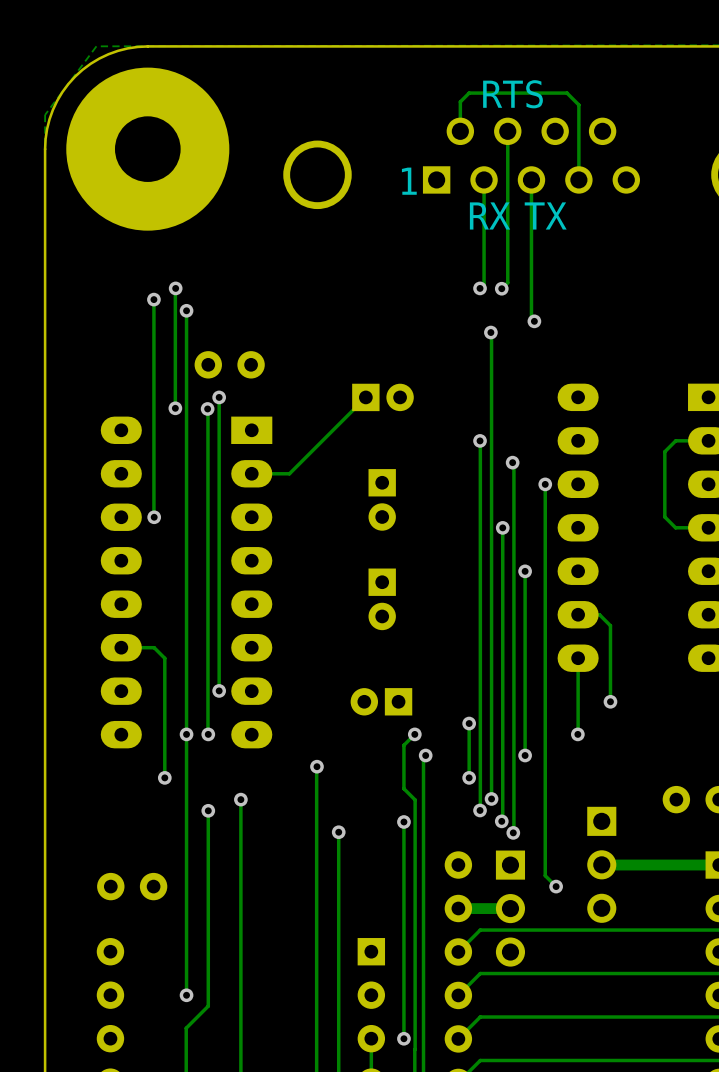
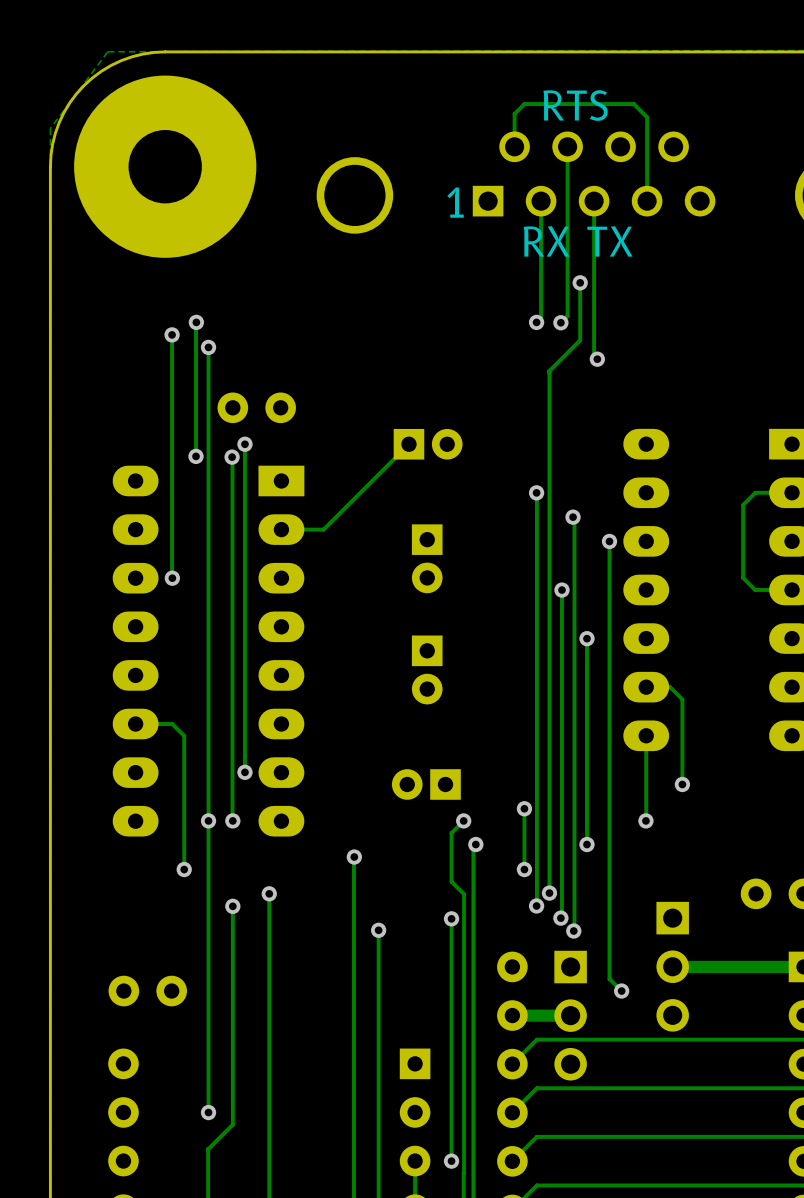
track: none -> (580, 282) (580, 340) (548, 371)
via position: (490, 332) -> (580, 282)

